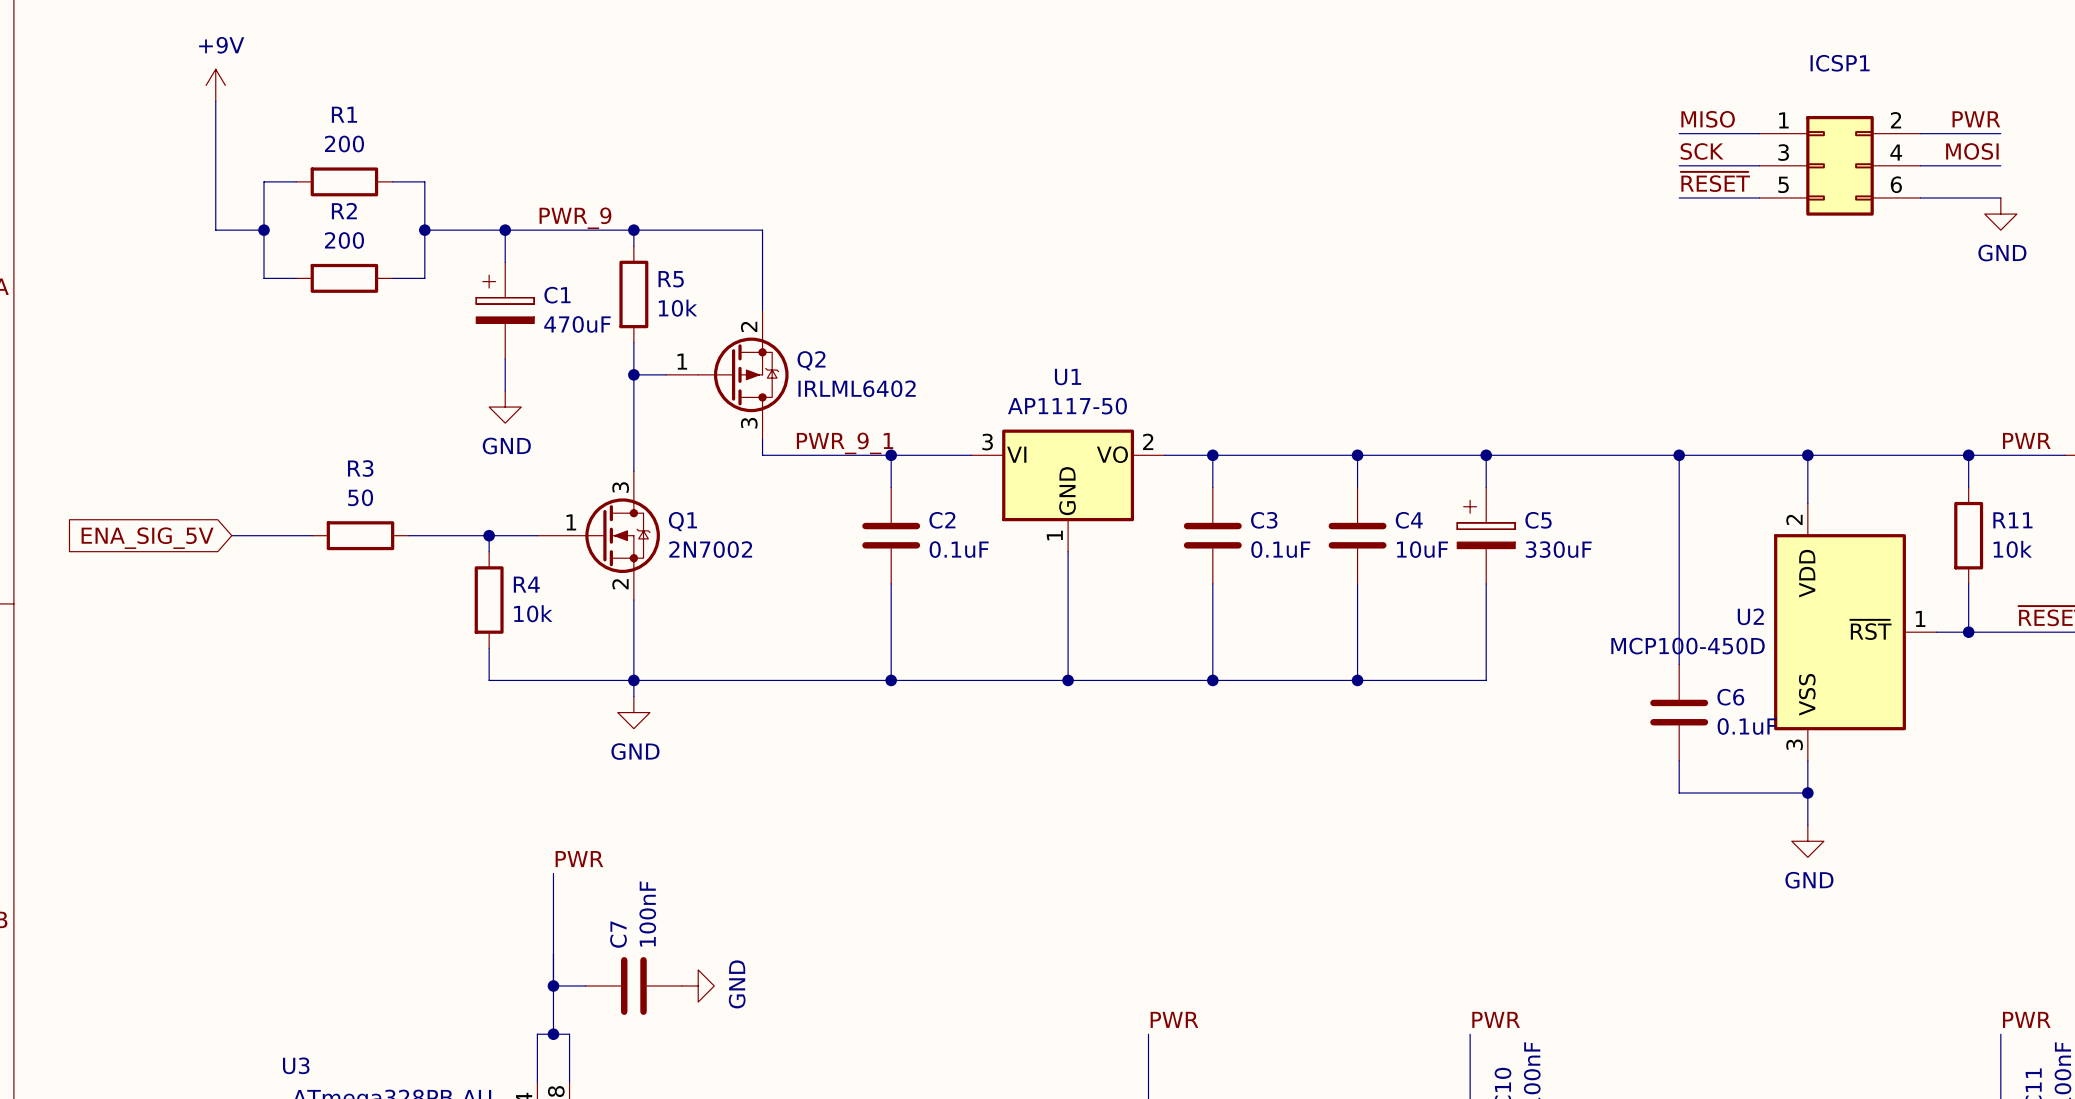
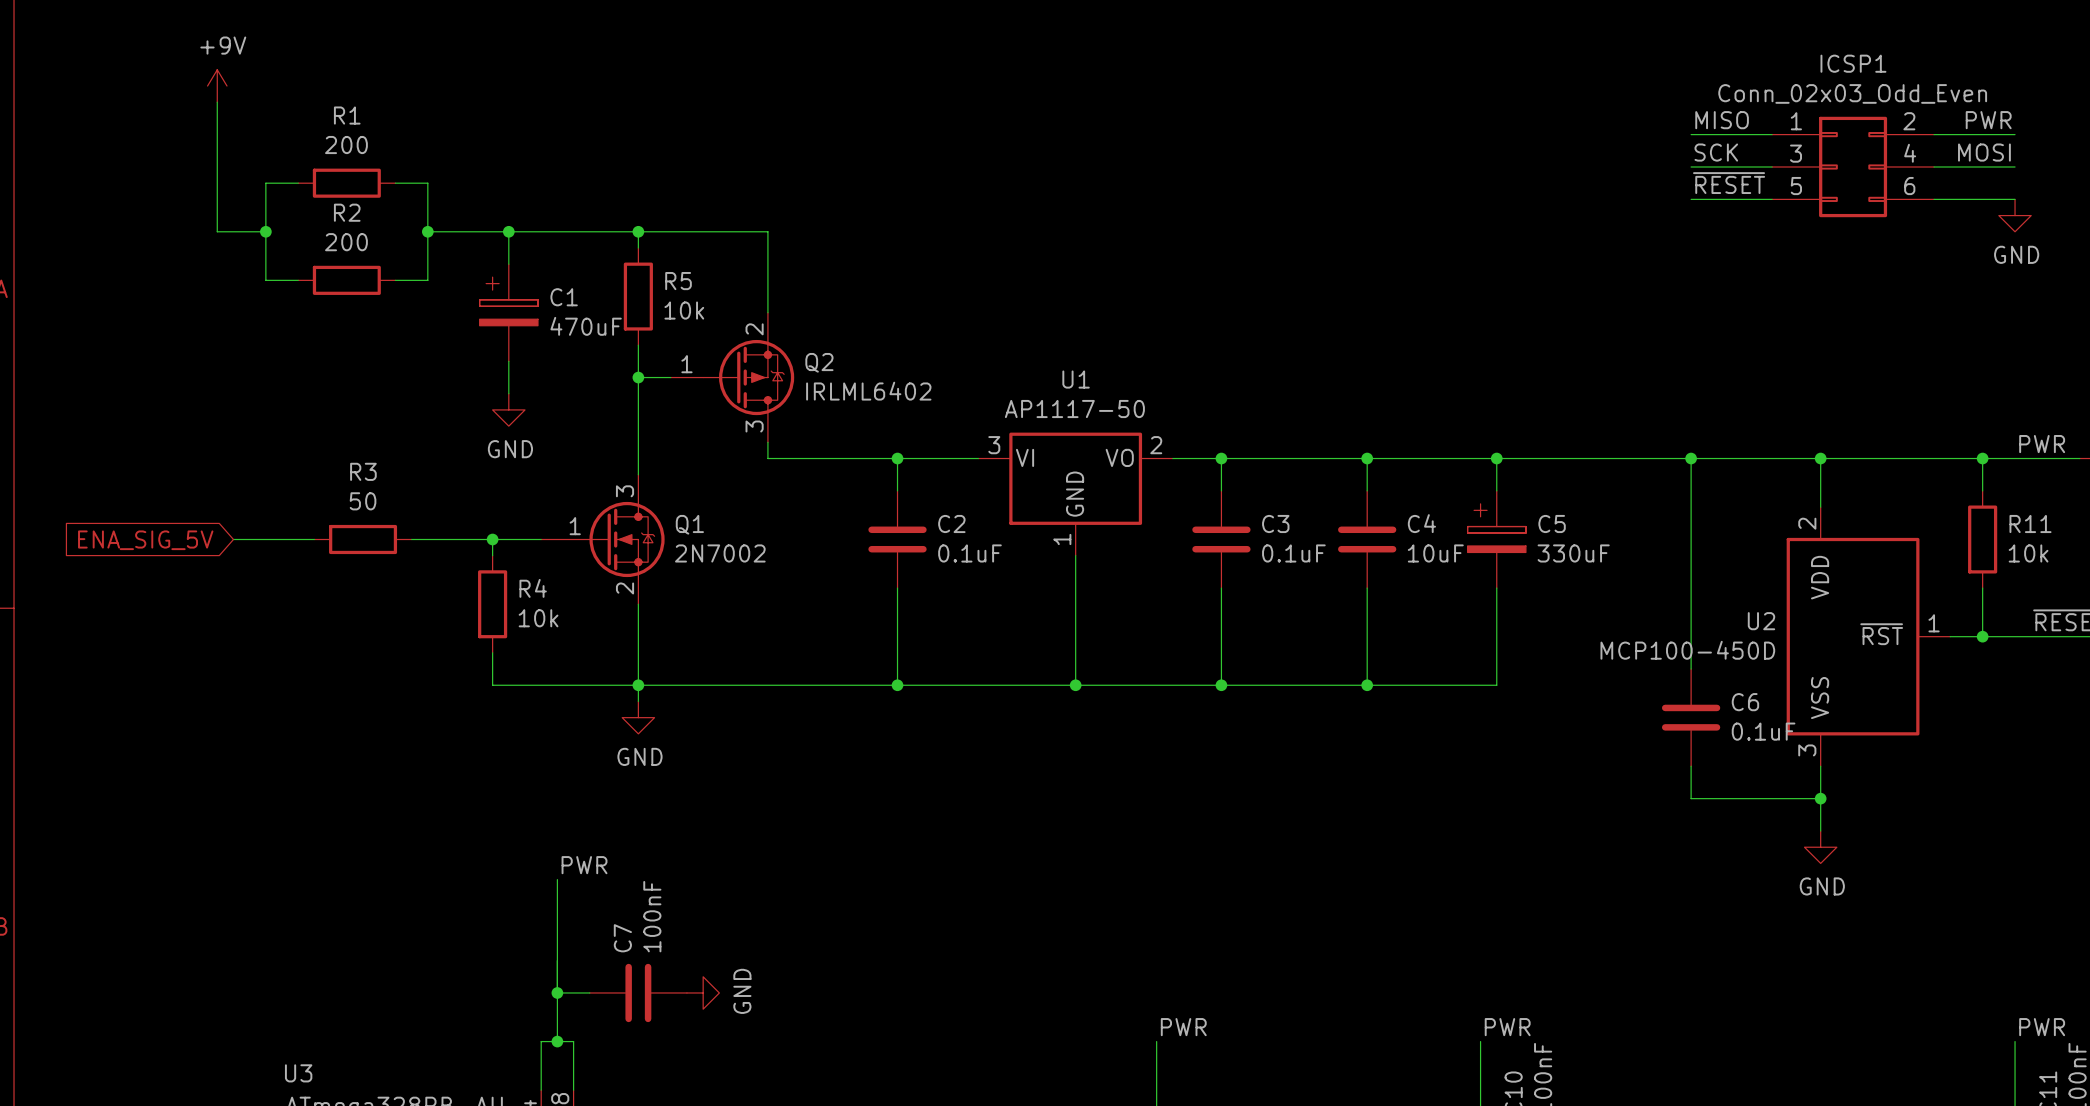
ICSP1 value: none -> Conn_02x03_Odd_Even (1852, 93)
label: PWR_9 (575, 218) -> none
label: PWR_9_1 (845, 443) -> none

